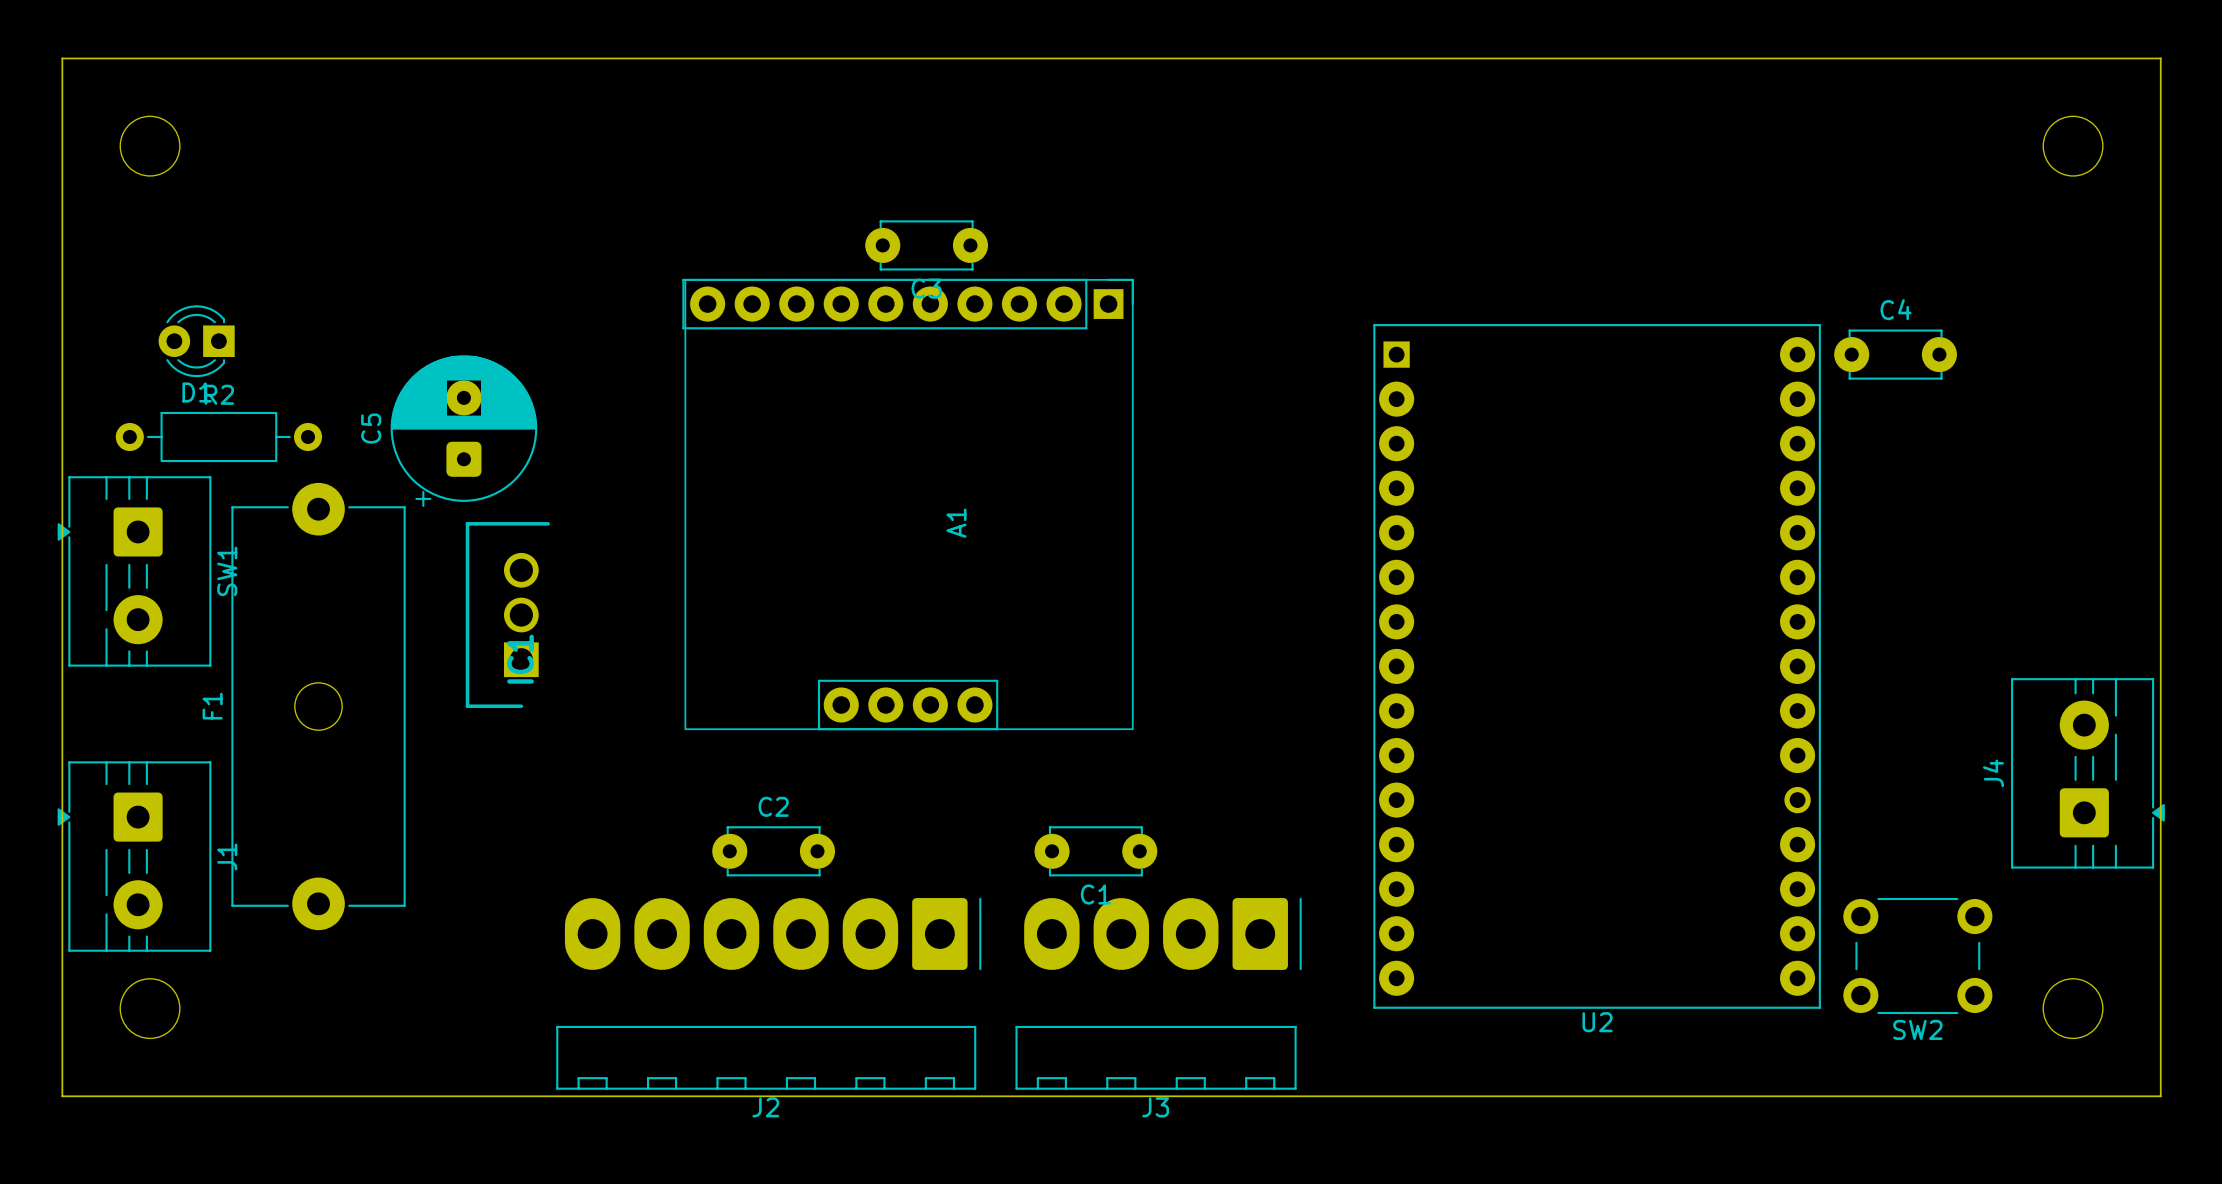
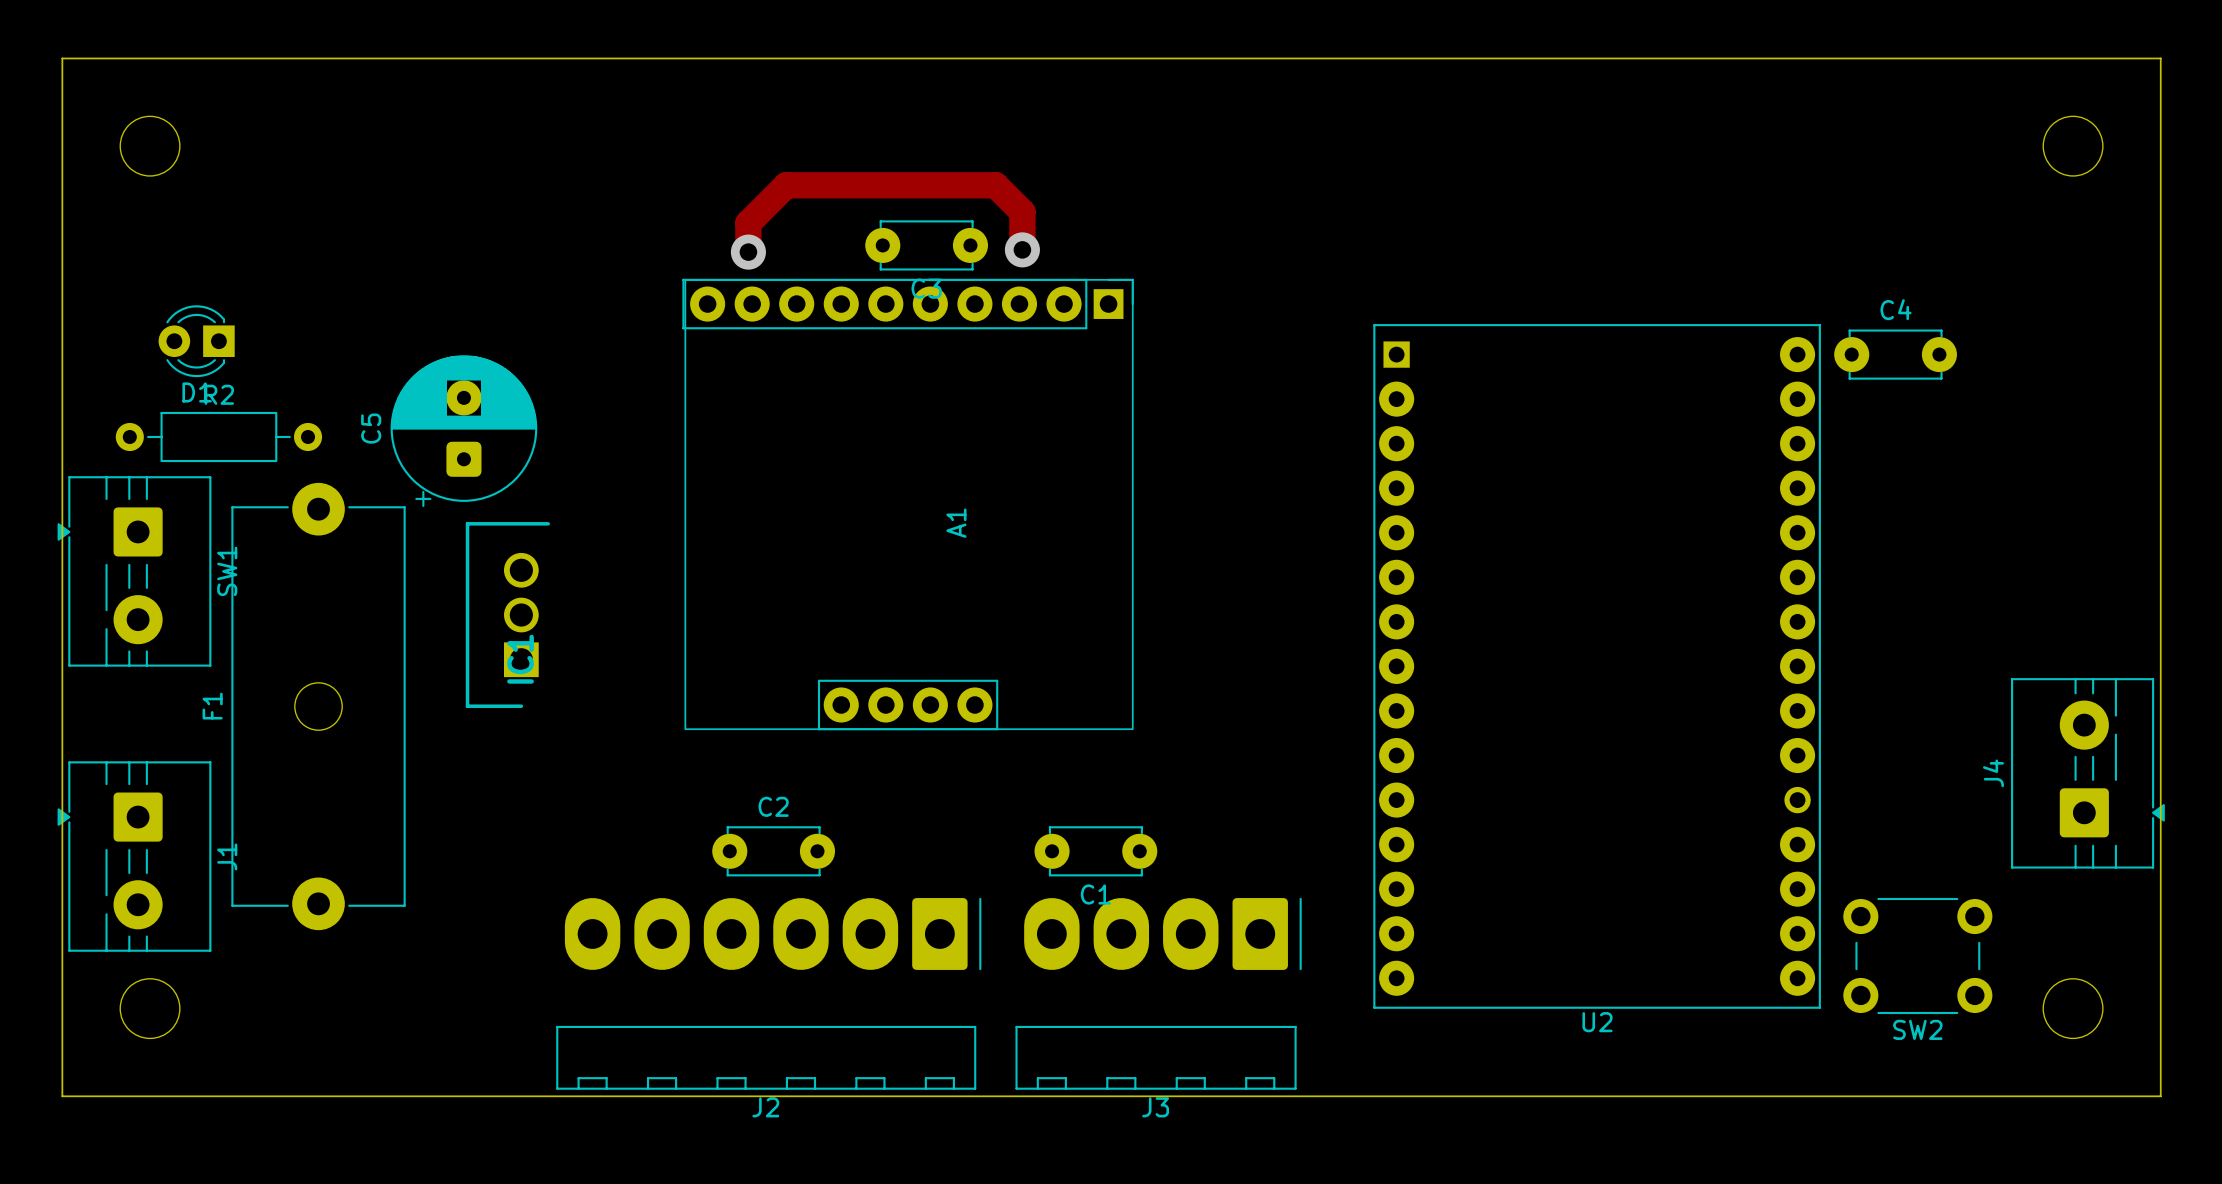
track: none -> (1022, 249) (1022, 212) (995, 185) (786, 185) (748, 223) (748, 252)
via: none -> (1022, 249)
via: none -> (748, 252)

